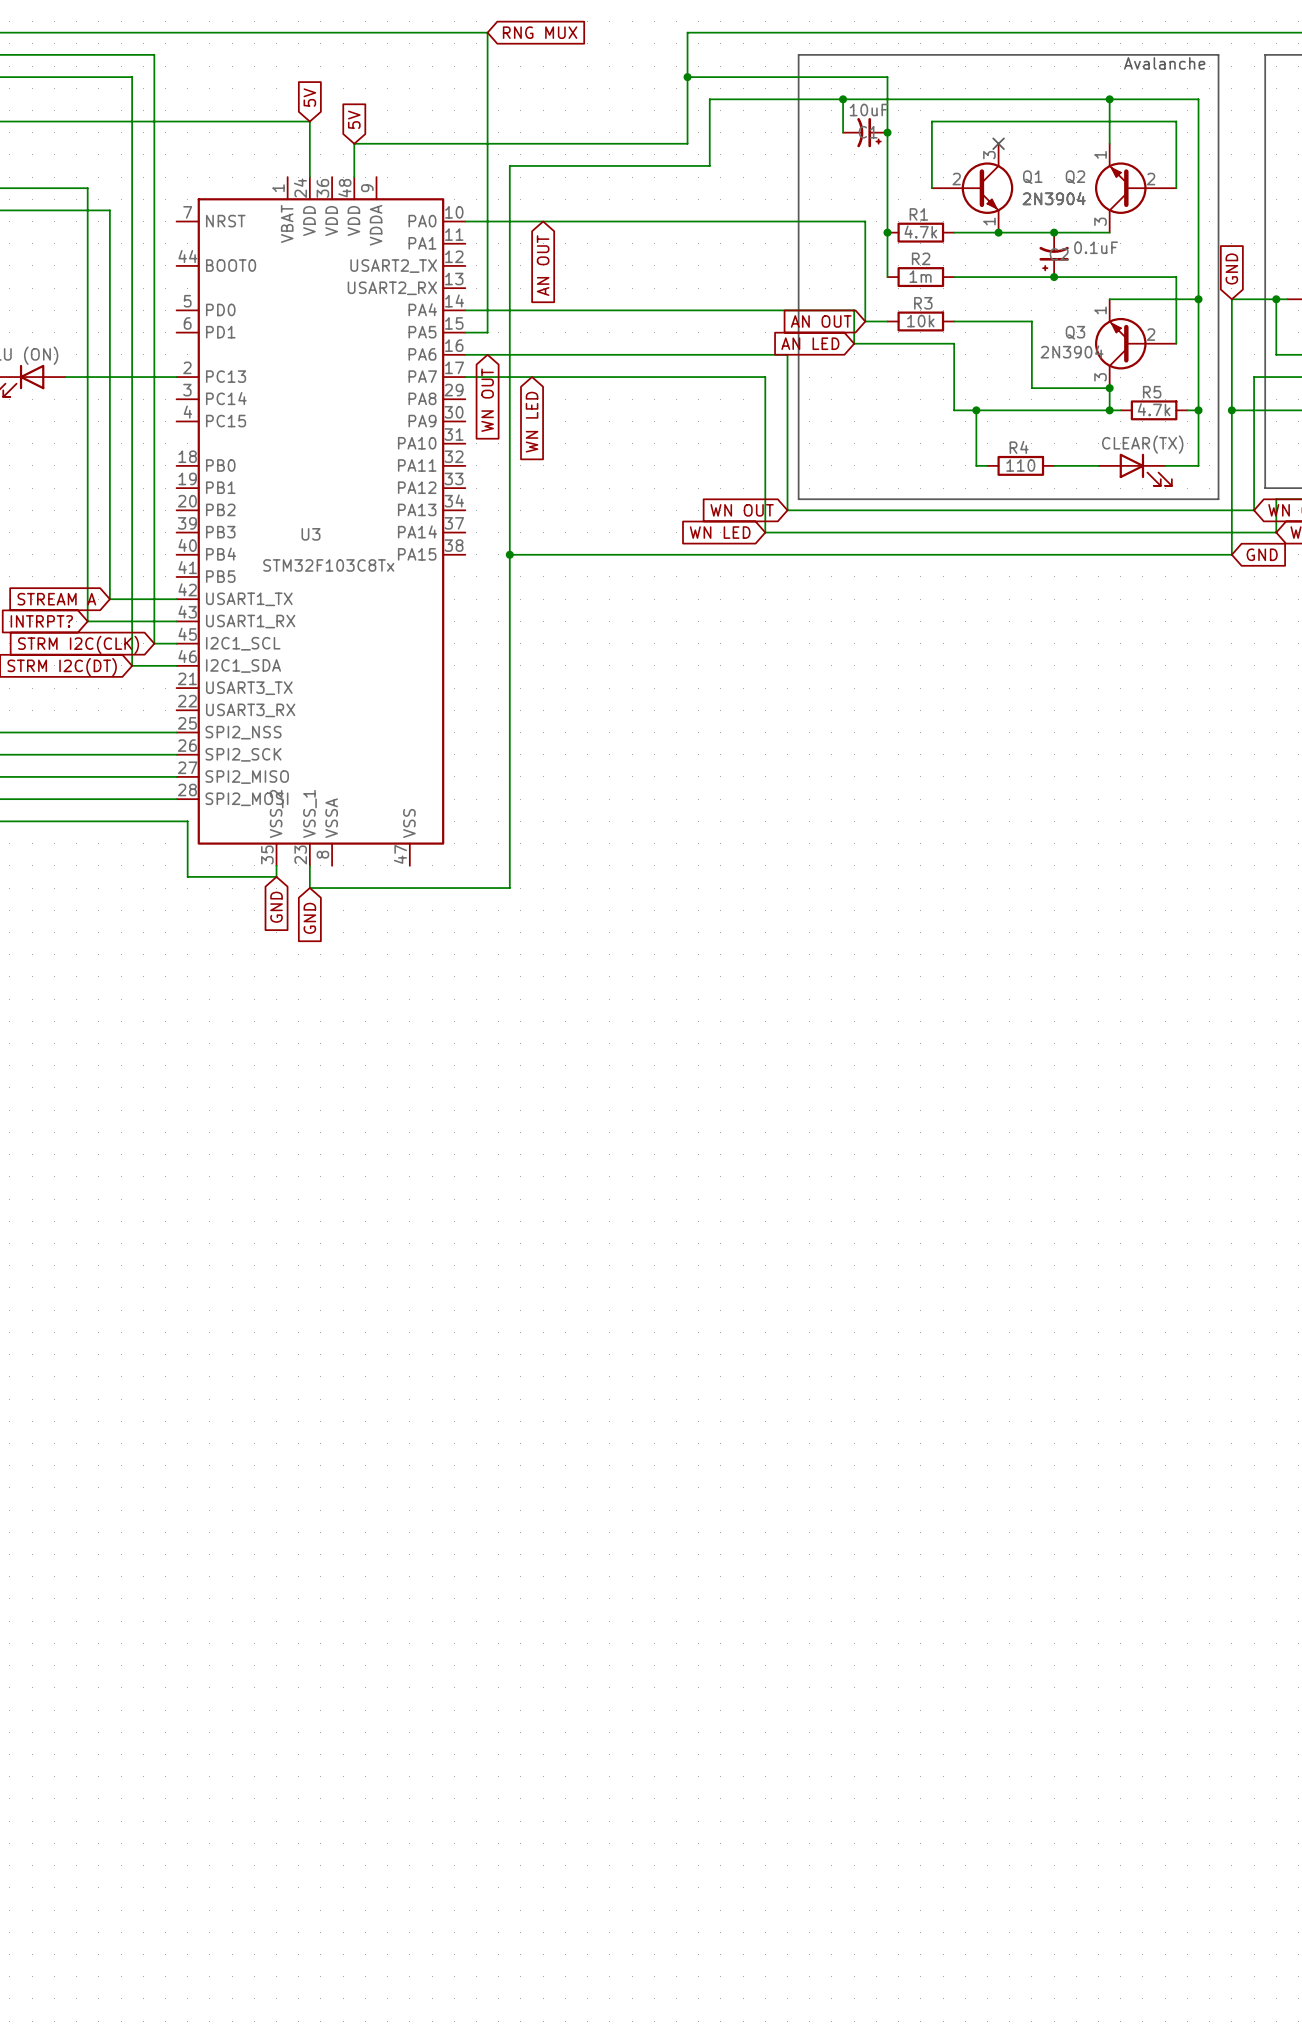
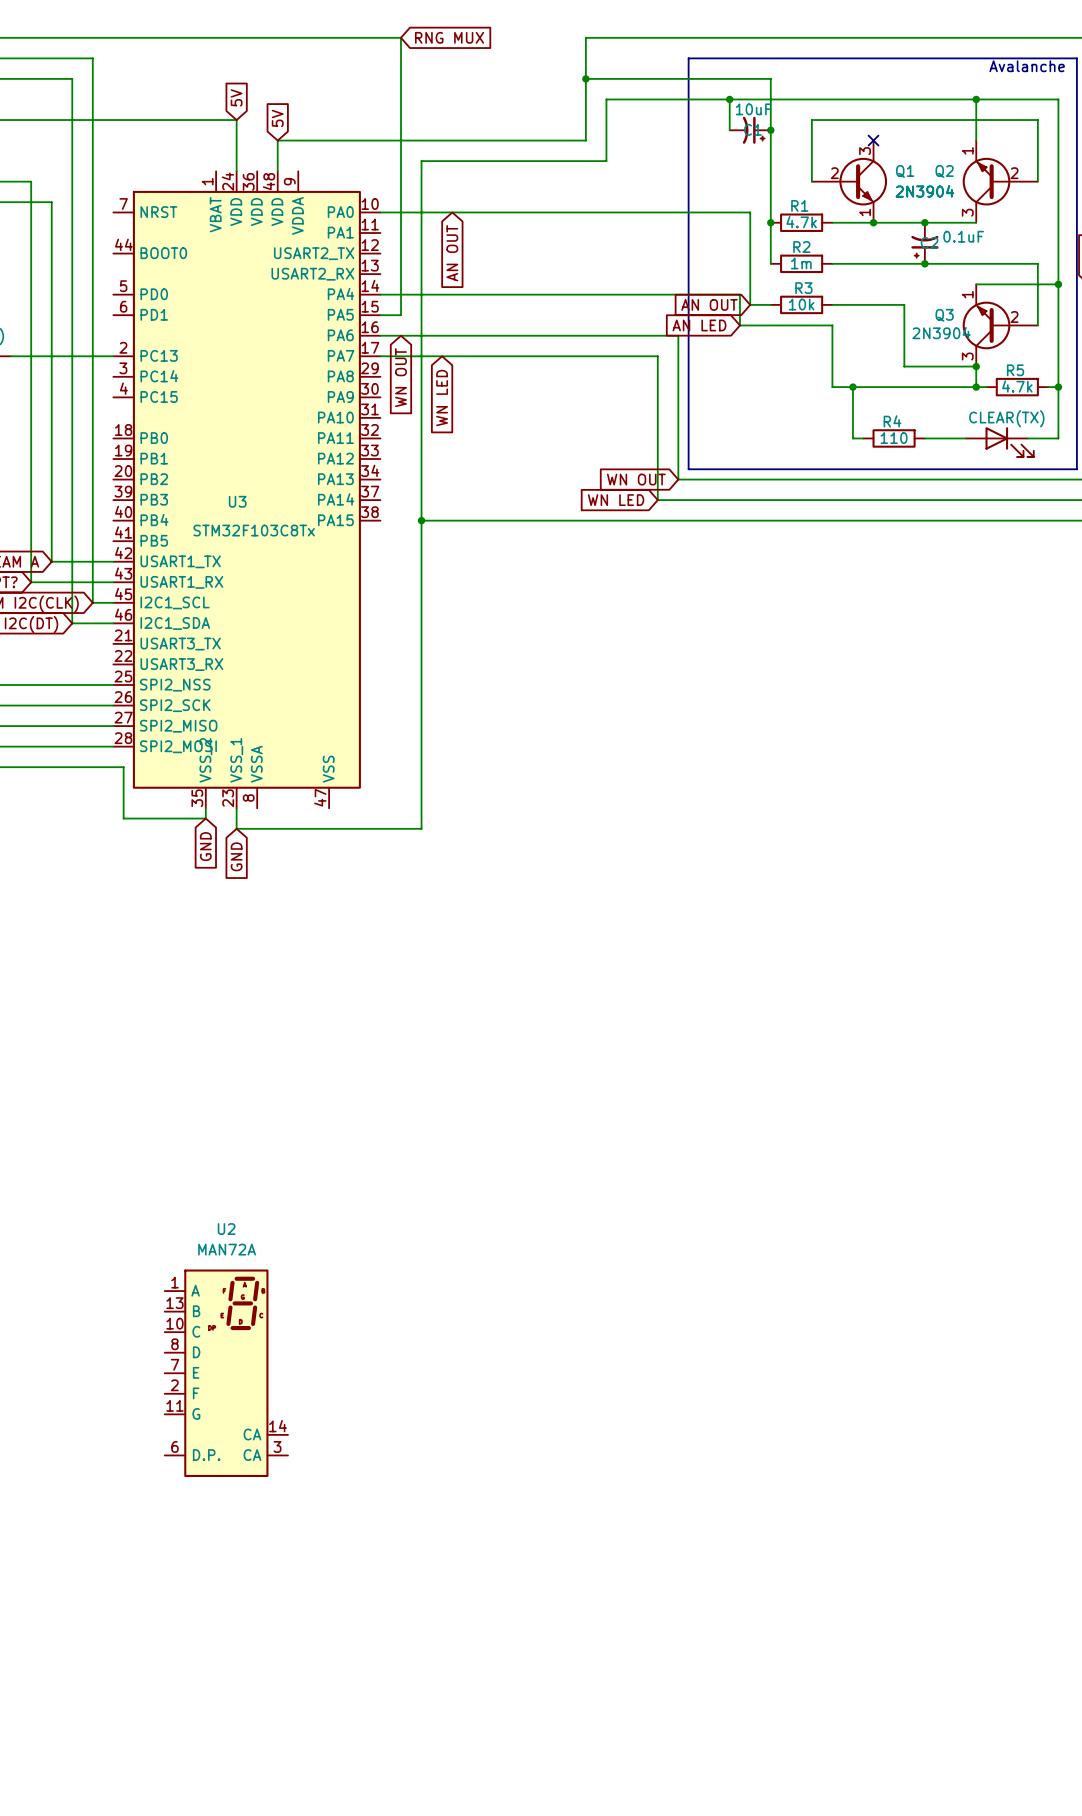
U2: none -> MAN72A (226, 1373)

